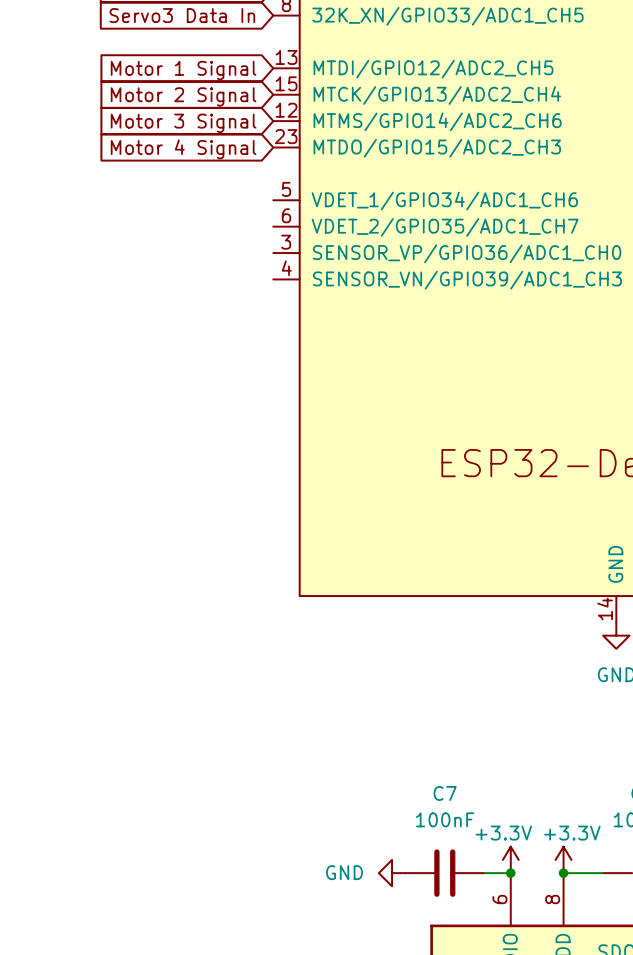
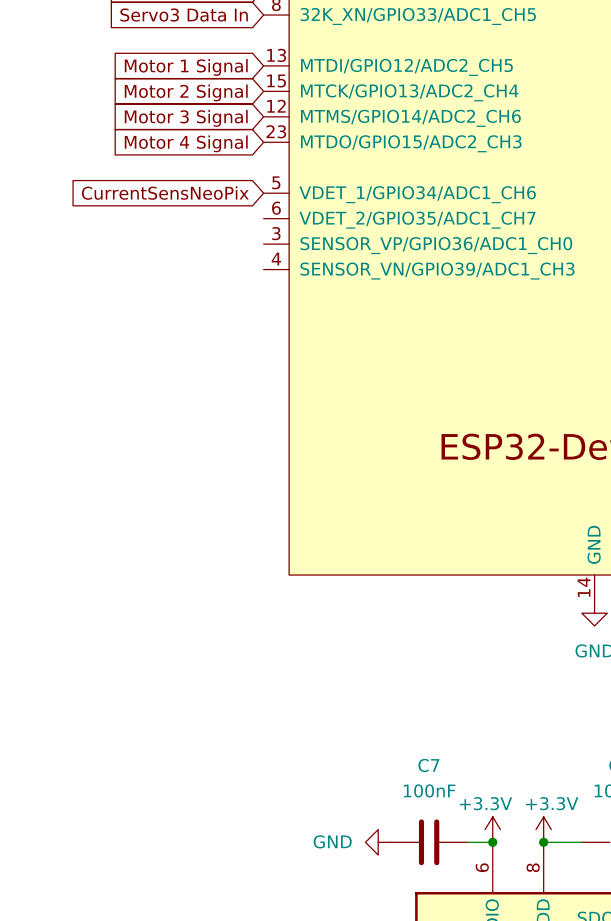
global label: none -> CurrentSensNeoPix (165, 193)

